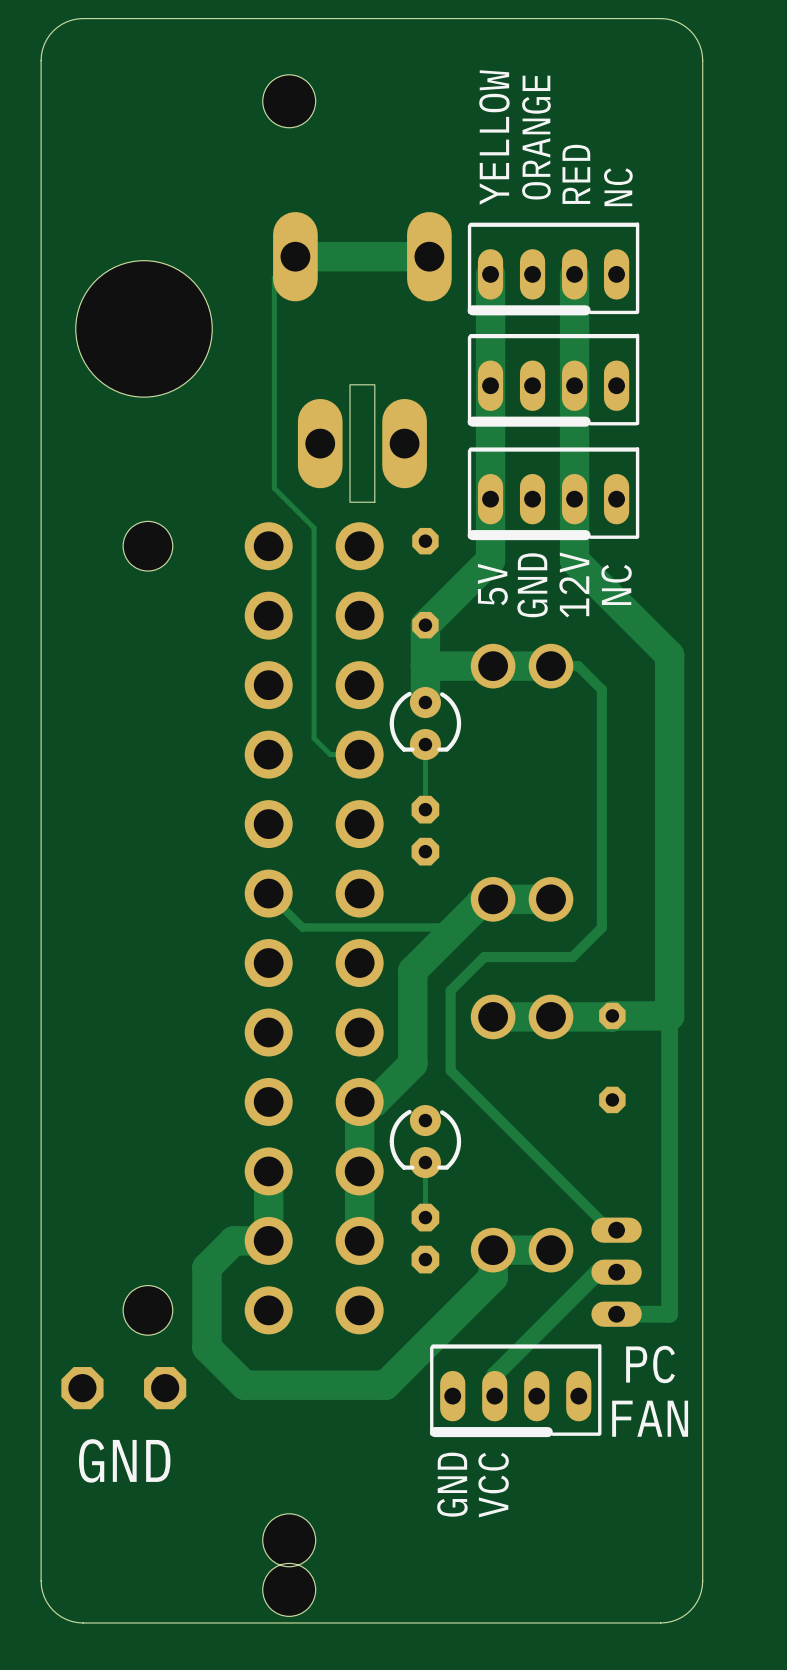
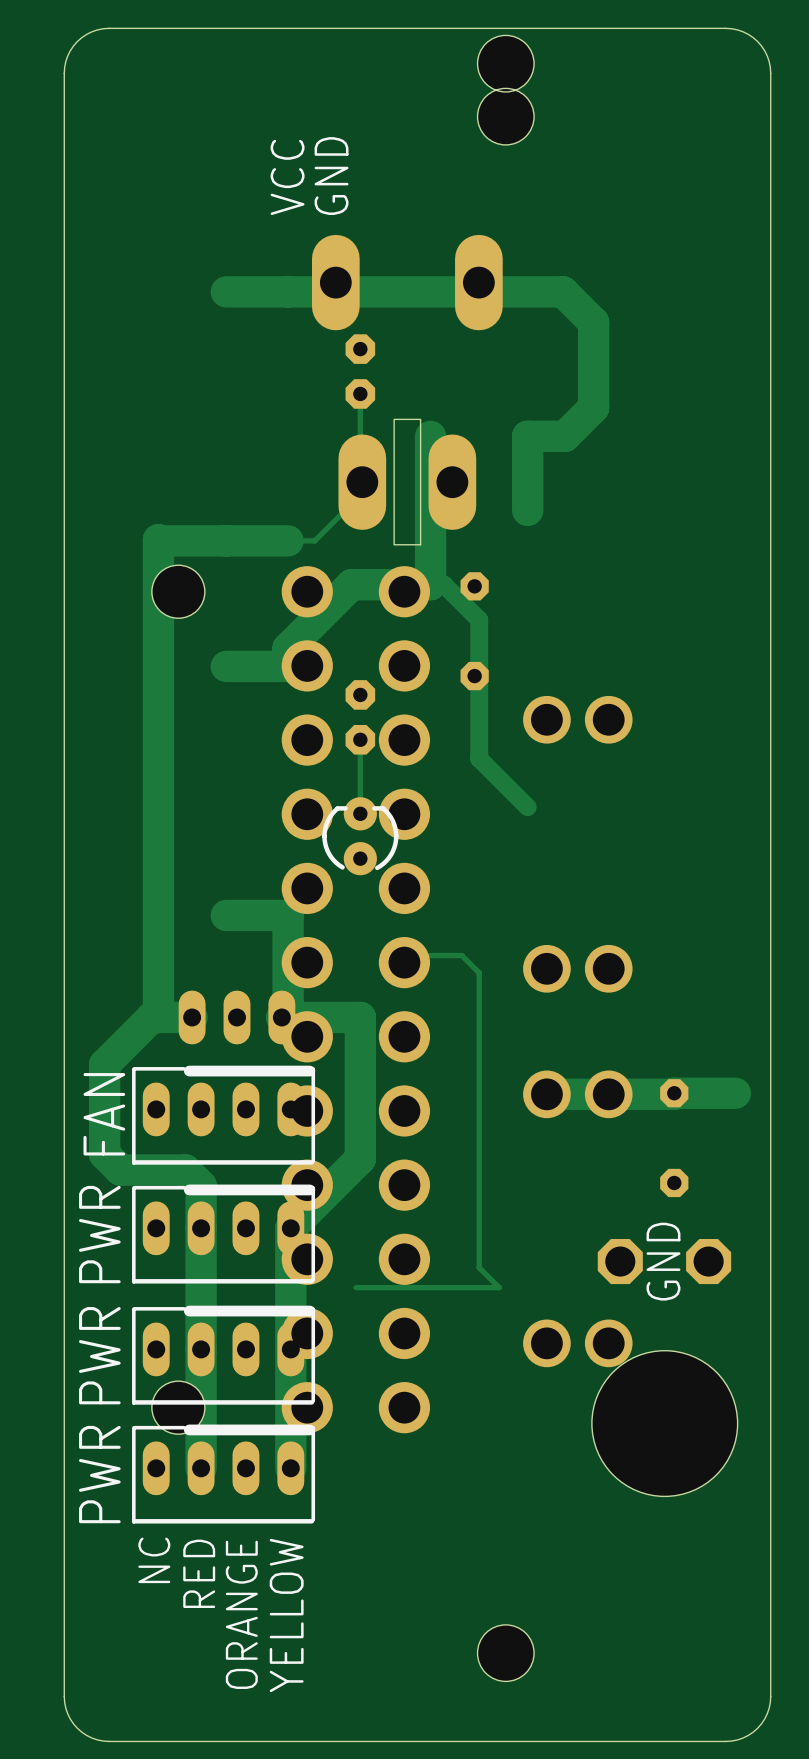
part: none -> (505, 63)
part: (289, 101) -> none
part: none -> (505, 116)
text: YELLOW (494, 137) -> none
text: ORANGE (536, 137) -> none
text: none -> GND (331, 176)
text: none -> VCC (287, 177)
text: RED (576, 174) -> none
text: NC (618, 187) -> none
track: (429, 256) (295, 256) (274, 277) (274, 488) (314, 528) (314, 738) (330, 754) (359, 754) -> none
track: none -> (226, 291) (563, 291) (593, 322) (593, 407) (564, 436) (527, 436) (527, 510)
part: (553, 268) -> none
track: (490, 274) (490, 560) (425, 625) (425, 702) -> none
track: (574, 274) (574, 560) (669, 655) (669, 1314) (616, 1314) -> none
hole: (144, 328) -> none
part: none -> (360, 371)
track: none -> (360, 393) (360, 450)
part: (553, 380) -> none
track: none -> (430, 436) (430, 584)
track: none -> (360, 495) (314, 540) (158, 539) (158, 1017)
part: (553, 493) -> none
track: none -> (430, 584) (351, 584) (288, 648) (288, 666) (226, 666)
track: none -> (430, 584) (444, 584) (479, 619) (479, 758) (527, 807)
text: 5V (492, 584) -> none
text: 12V (574, 584) -> none
text: NC (616, 584) -> none
text: GND (532, 585) -> none
track: (425, 666) (578, 666) (601, 689) (601, 927) (572, 957) (484, 957) (450, 990) (450, 1070) (610, 1230) (616, 1230) -> none
track: none -> (360, 739) (360, 813)
part rotation: 0° (425, 723) -> 180° (360, 836)
part position: (425, 723) -> (360, 836)
track: (425, 744) (425, 809) -> none
part position: (425, 830) -> (360, 717)
track: none -> (226, 915) (288, 915) (288, 1011) (281, 1017) (360, 1017) (360, 1158) (290, 1228) (290, 1468)
track: none -> (430, 955) (461, 955) (479, 972) (479, 1267) (499, 1287) (356, 1287)
track: (268, 893) (302, 927) (456, 927) (480, 903) -> none
track: (551, 899) (493, 899) (489, 903) (480, 903) (412, 970) (412, 1063) (374, 1101) (359, 1101) (359, 1240) -> none
track: none -> (192, 1017) (151, 1017) (104, 1064) (104, 1154) (120, 1170) (185, 1170) (201, 1185) (201, 1468)
part: none -> (236, 1017)
text: none -> FAN (104, 1114)
part: none -> (223, 1115)
part: (425, 1141) -> none
part: none -> (223, 1234)
text: none -> PWR (99, 1234)
track: (425, 1162) (425, 1217) -> none
track: (268, 1171) (268, 1240) (233, 1240) (206, 1267) (206, 1347) (244, 1385) (385, 1385) (493, 1277) (493, 1250) (551, 1250) -> none
part: none -> (620, 1261)
text: none -> GND (663, 1261)
part: none -> (708, 1261)
part: (425, 1238) -> none
text: none -> PWR (99, 1355)
part: none -> (223, 1355)
track: (616, 1272) (597, 1272) (494, 1375) (494, 1396) -> none
part: (616, 1272) -> none
hole: none -> (664, 1423)
text: PC (650, 1364) -> none
text: none -> PWR (99, 1474)
part: none -> (223, 1474)
part: (82, 1388) -> none
part: (165, 1388) -> none
part: (515, 1390) -> none
text: FAN (650, 1418) -> none
text: GND (124, 1460) -> NC (154, 1560)
text: none -> RED (199, 1573)
text: GND (452, 1484) -> none
text: VCC (493, 1485) -> none
text: none -> ORANGE (241, 1614)
text: none -> YELLOW (286, 1615)
part: (289, 1540) -> none
part: none -> (505, 1653)
part: (289, 1589) -> none

